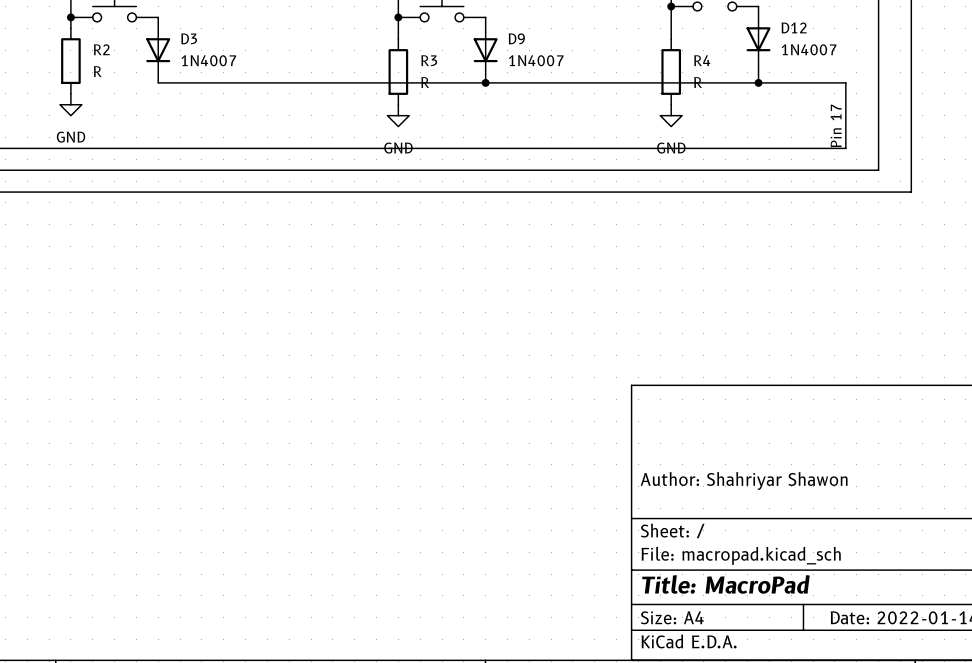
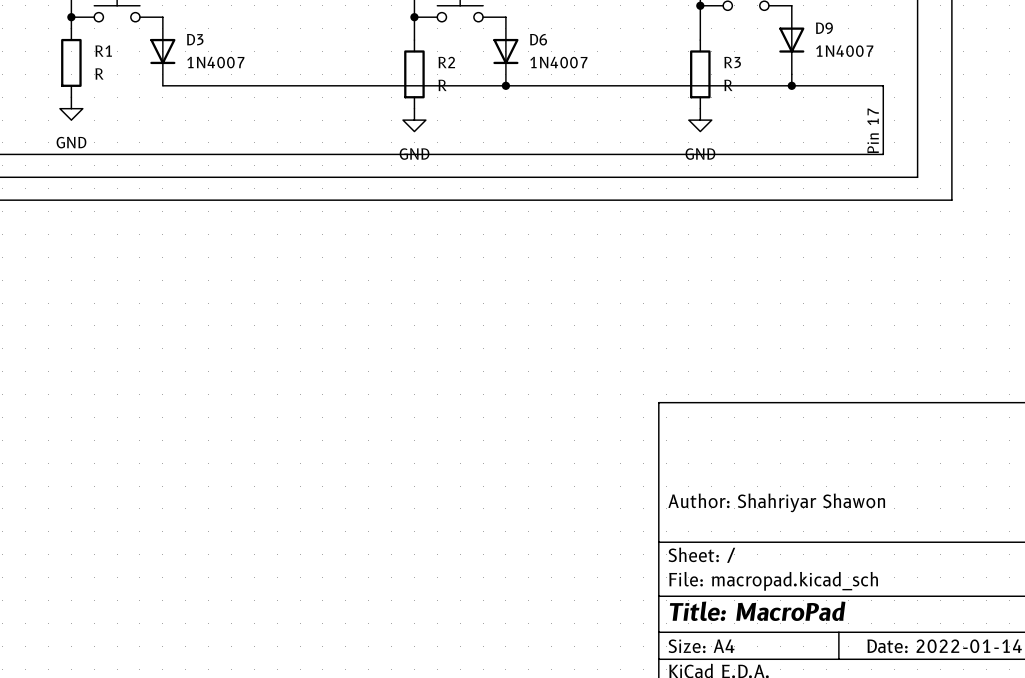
D12 name: D12 (794, 27) -> D9 (824, 28)
D9 name: D9 (516, 38) -> D6 (538, 39)
R2 name: R2 (101, 49) -> R1 (103, 51)
R3 name: R3 (429, 60) -> R2 (446, 62)
R4 name: R4 (702, 60) -> R3 (732, 62)

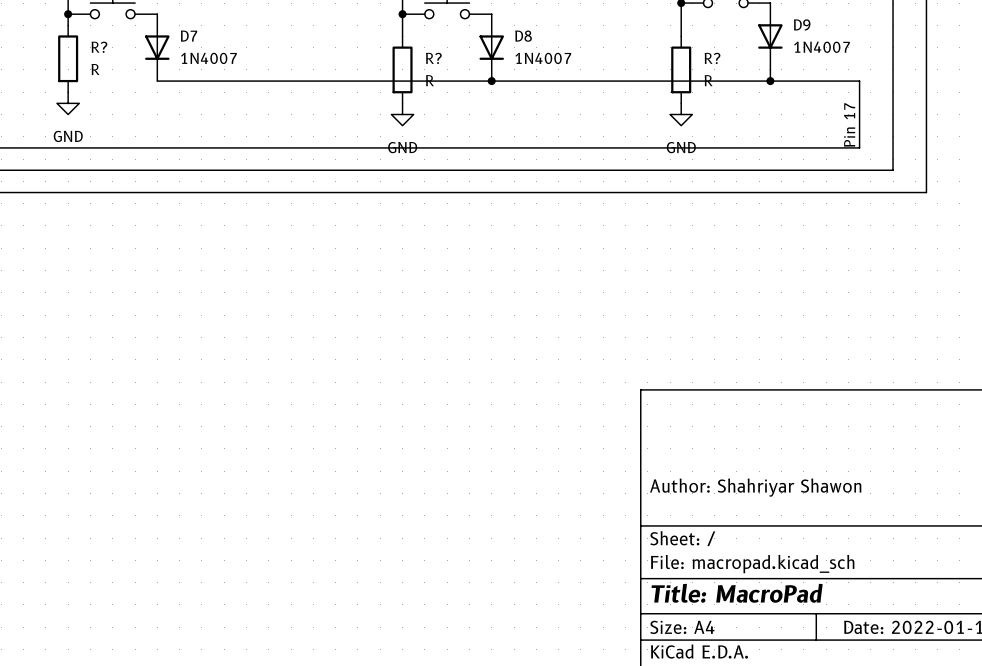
D3 name: D3 (195, 39) -> D7 (189, 36)
D6 name: D6 (538, 39) -> D8 (523, 36)
R1 name: R1 (103, 51) -> R? (99, 47)
R2 name: R2 (446, 62) -> R? (433, 58)
R3 name: R3 (732, 62) -> R? (712, 58)

